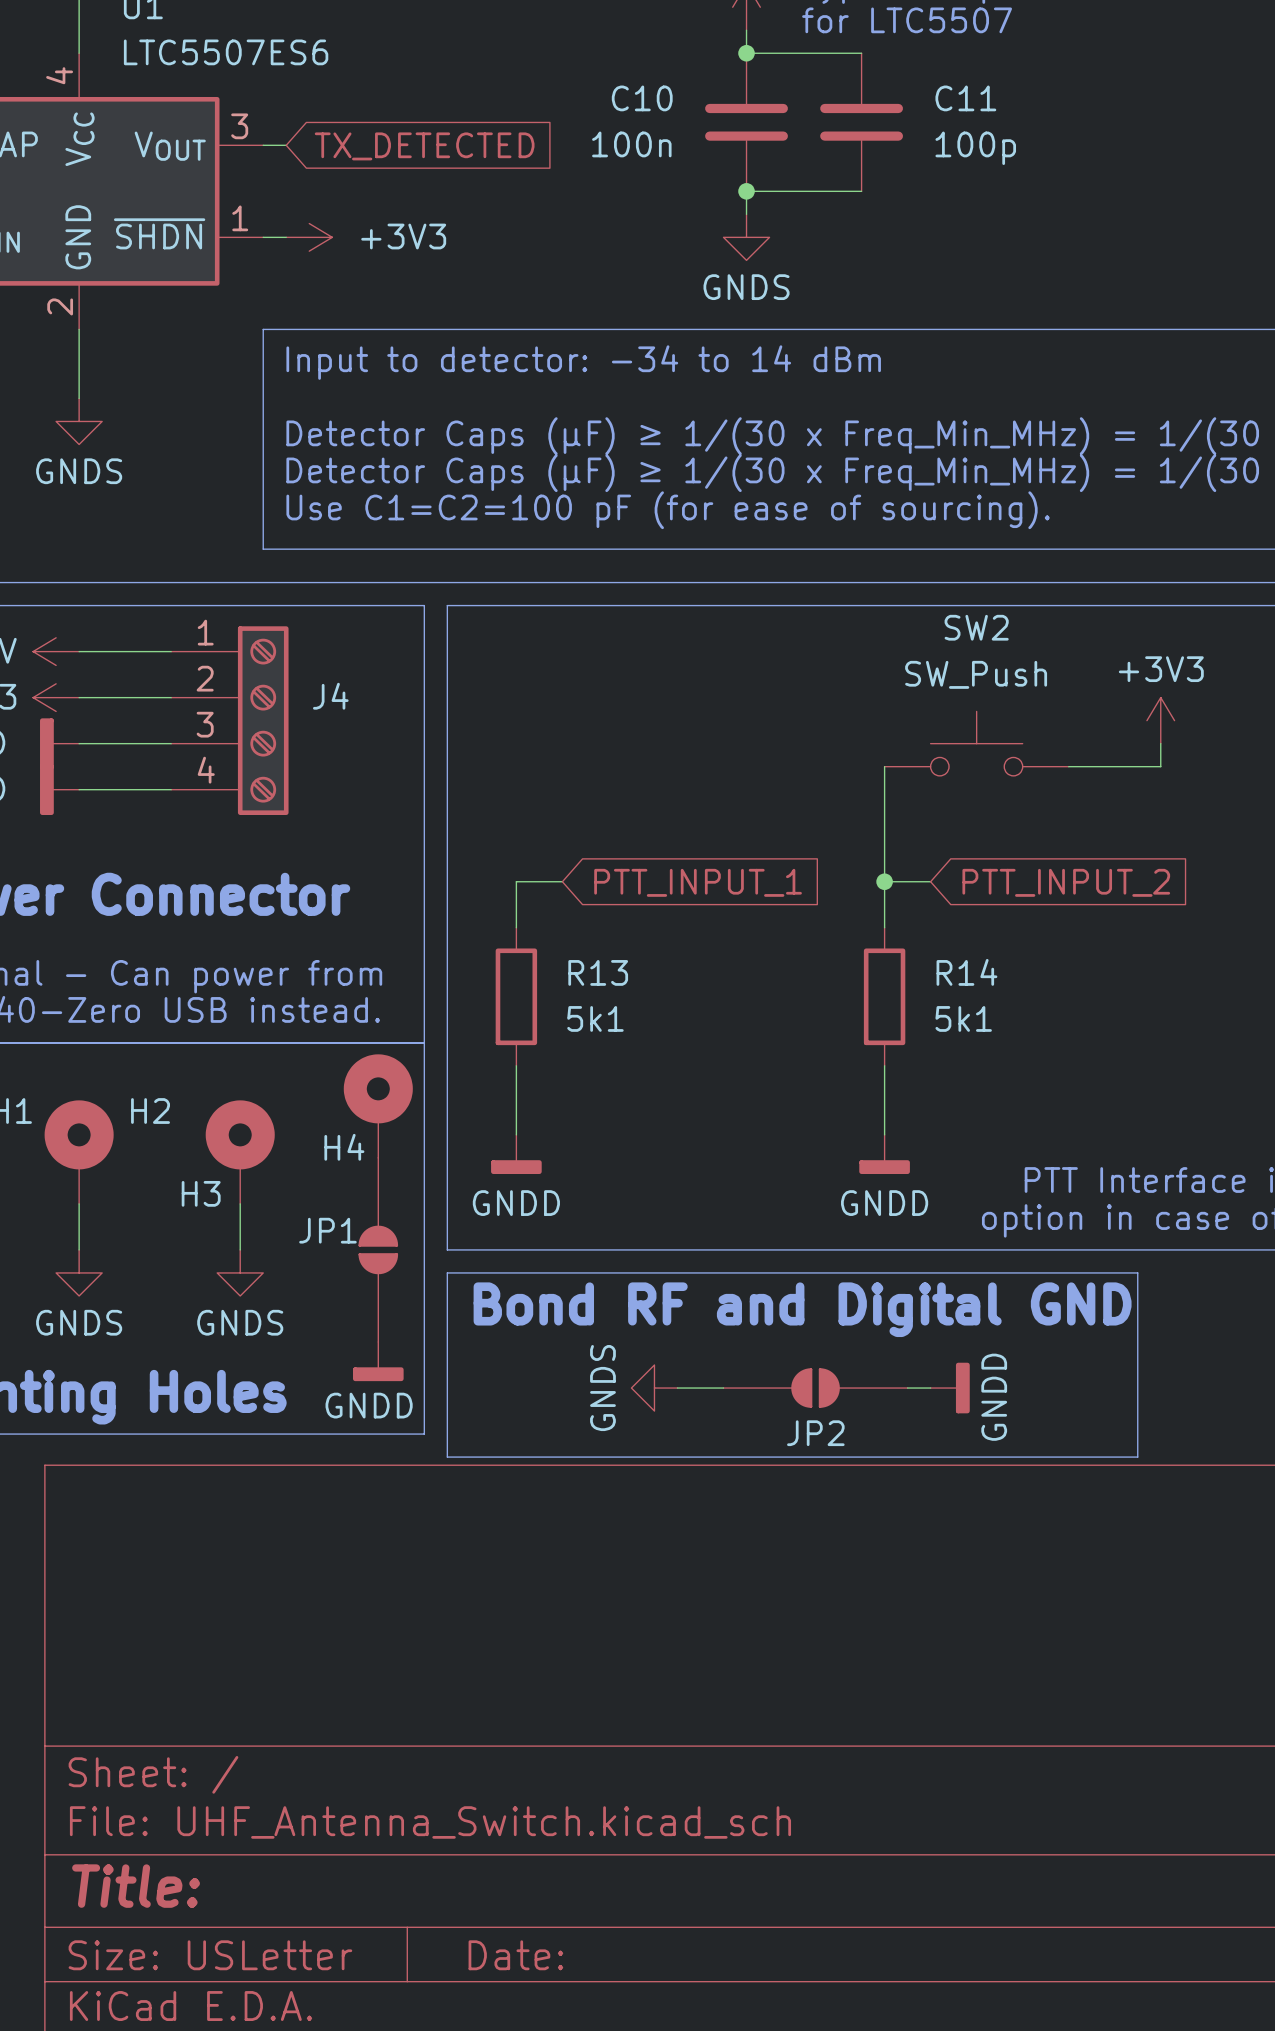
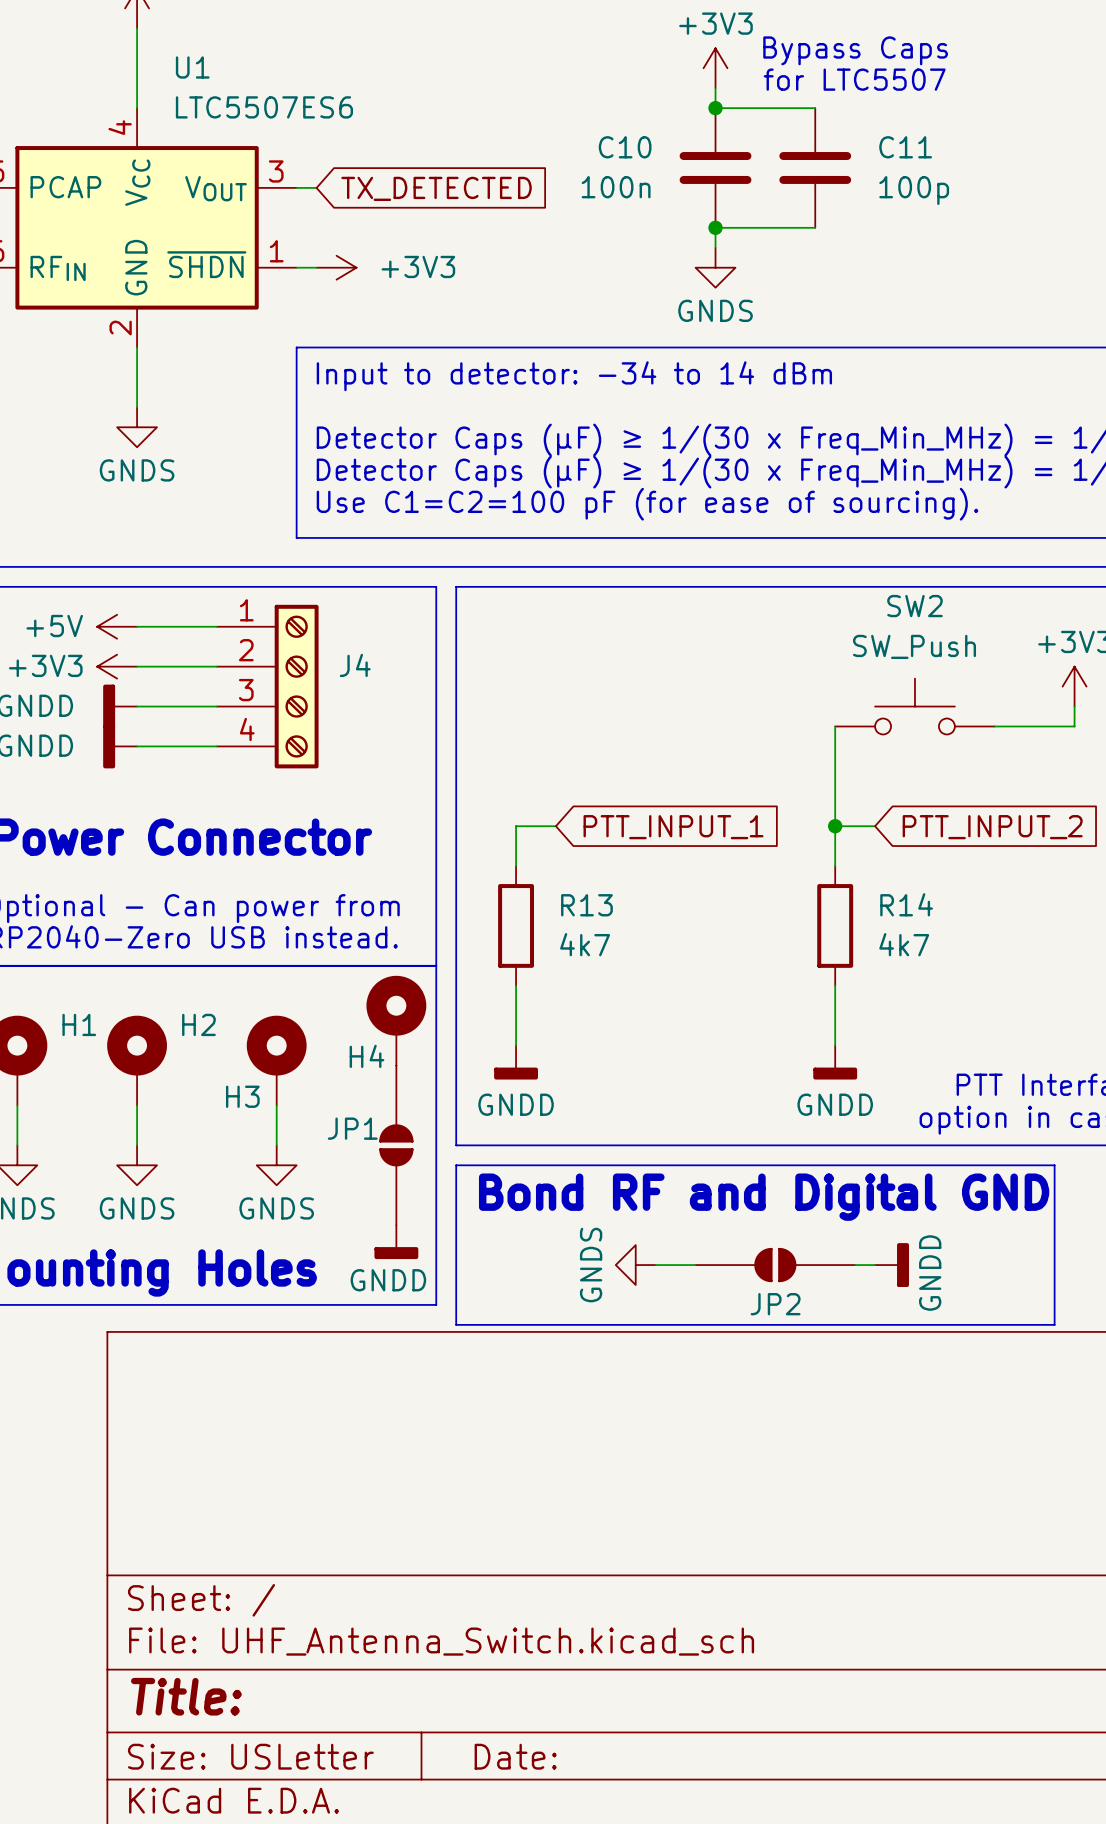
R13 value: 5k1 (595, 1018) -> 4k7 (585, 944)
R14 value: 5k1 (963, 1018) -> 4k7 (904, 944)

